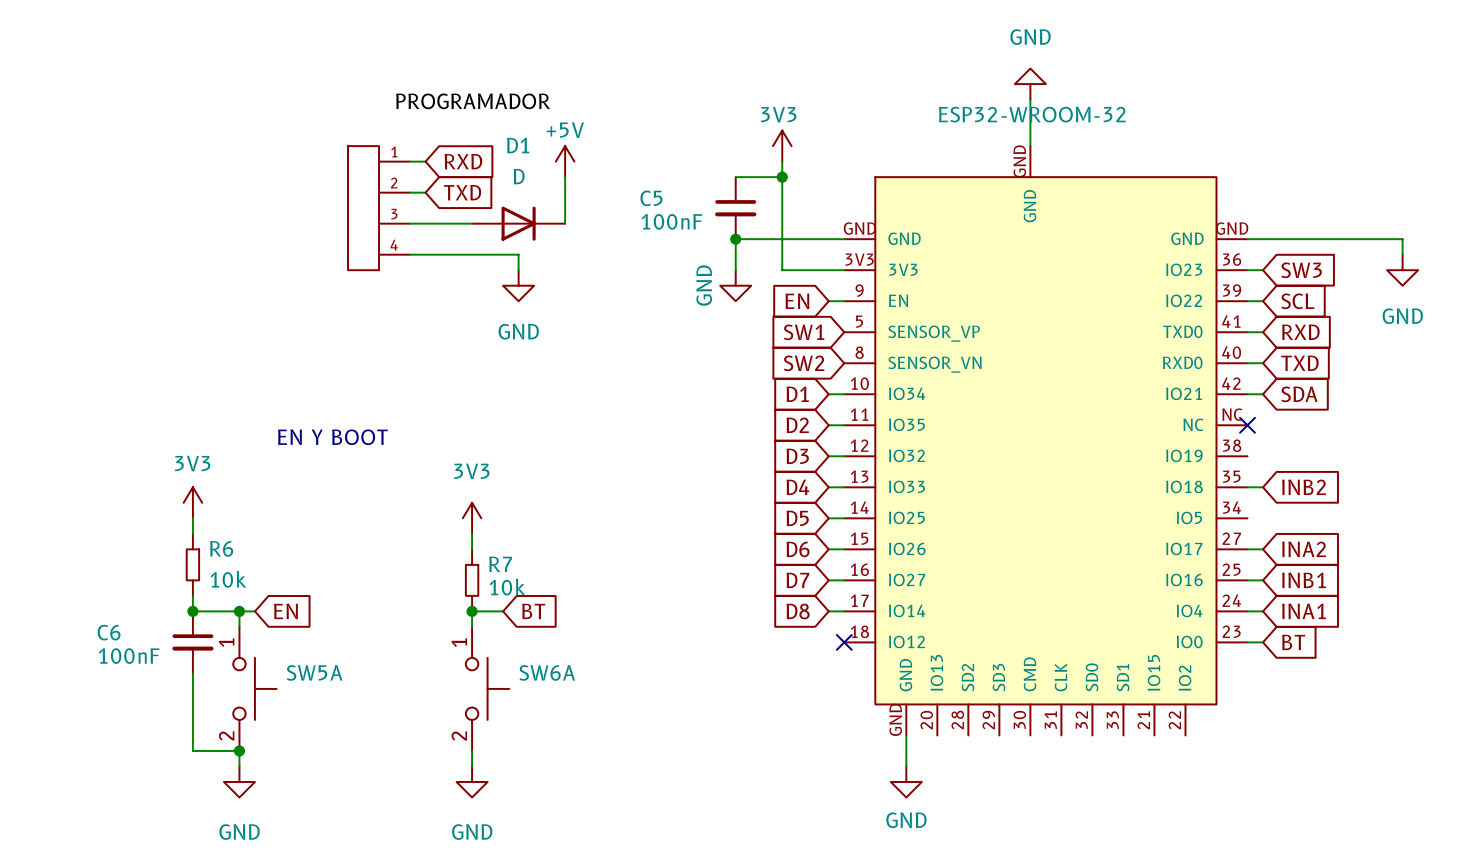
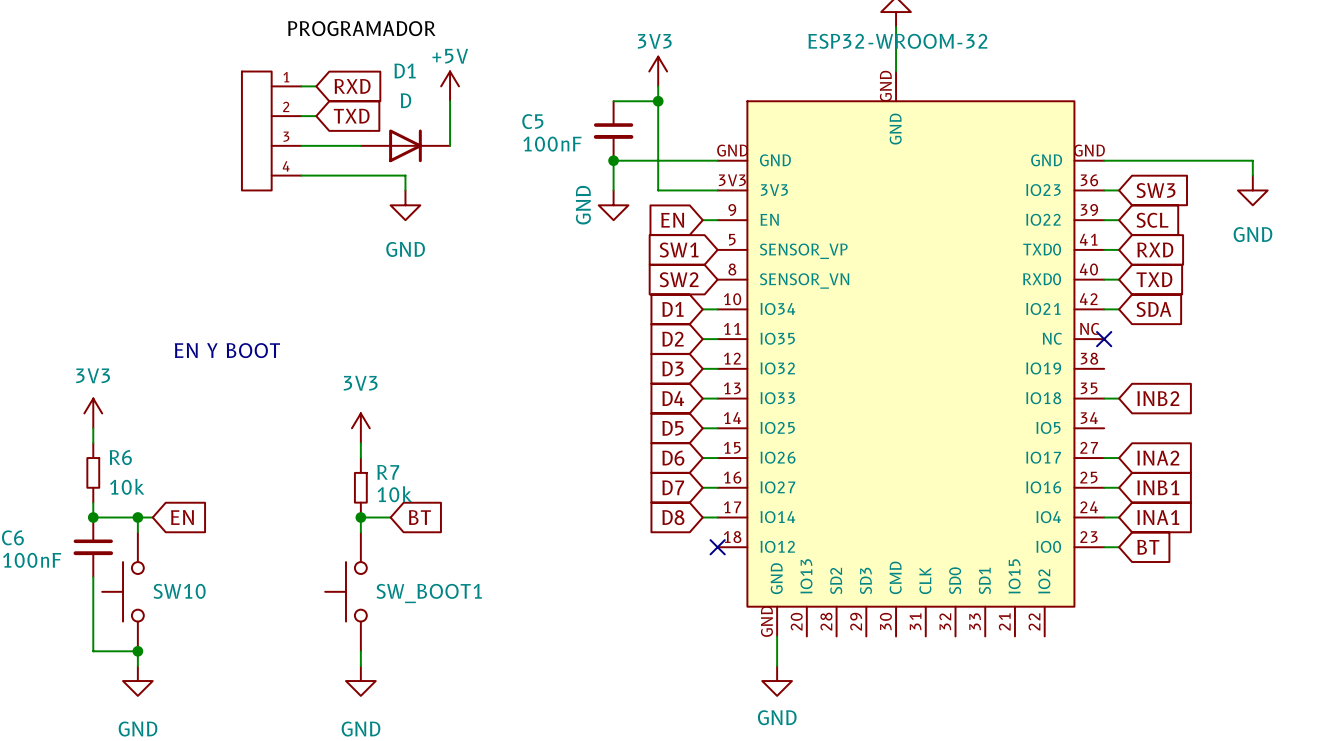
SW10: none -> (123, 591)
SW5A: (254, 688) -> none
SW_BOOT1: none -> (346, 591)
SW6A: (487, 688) -> none

